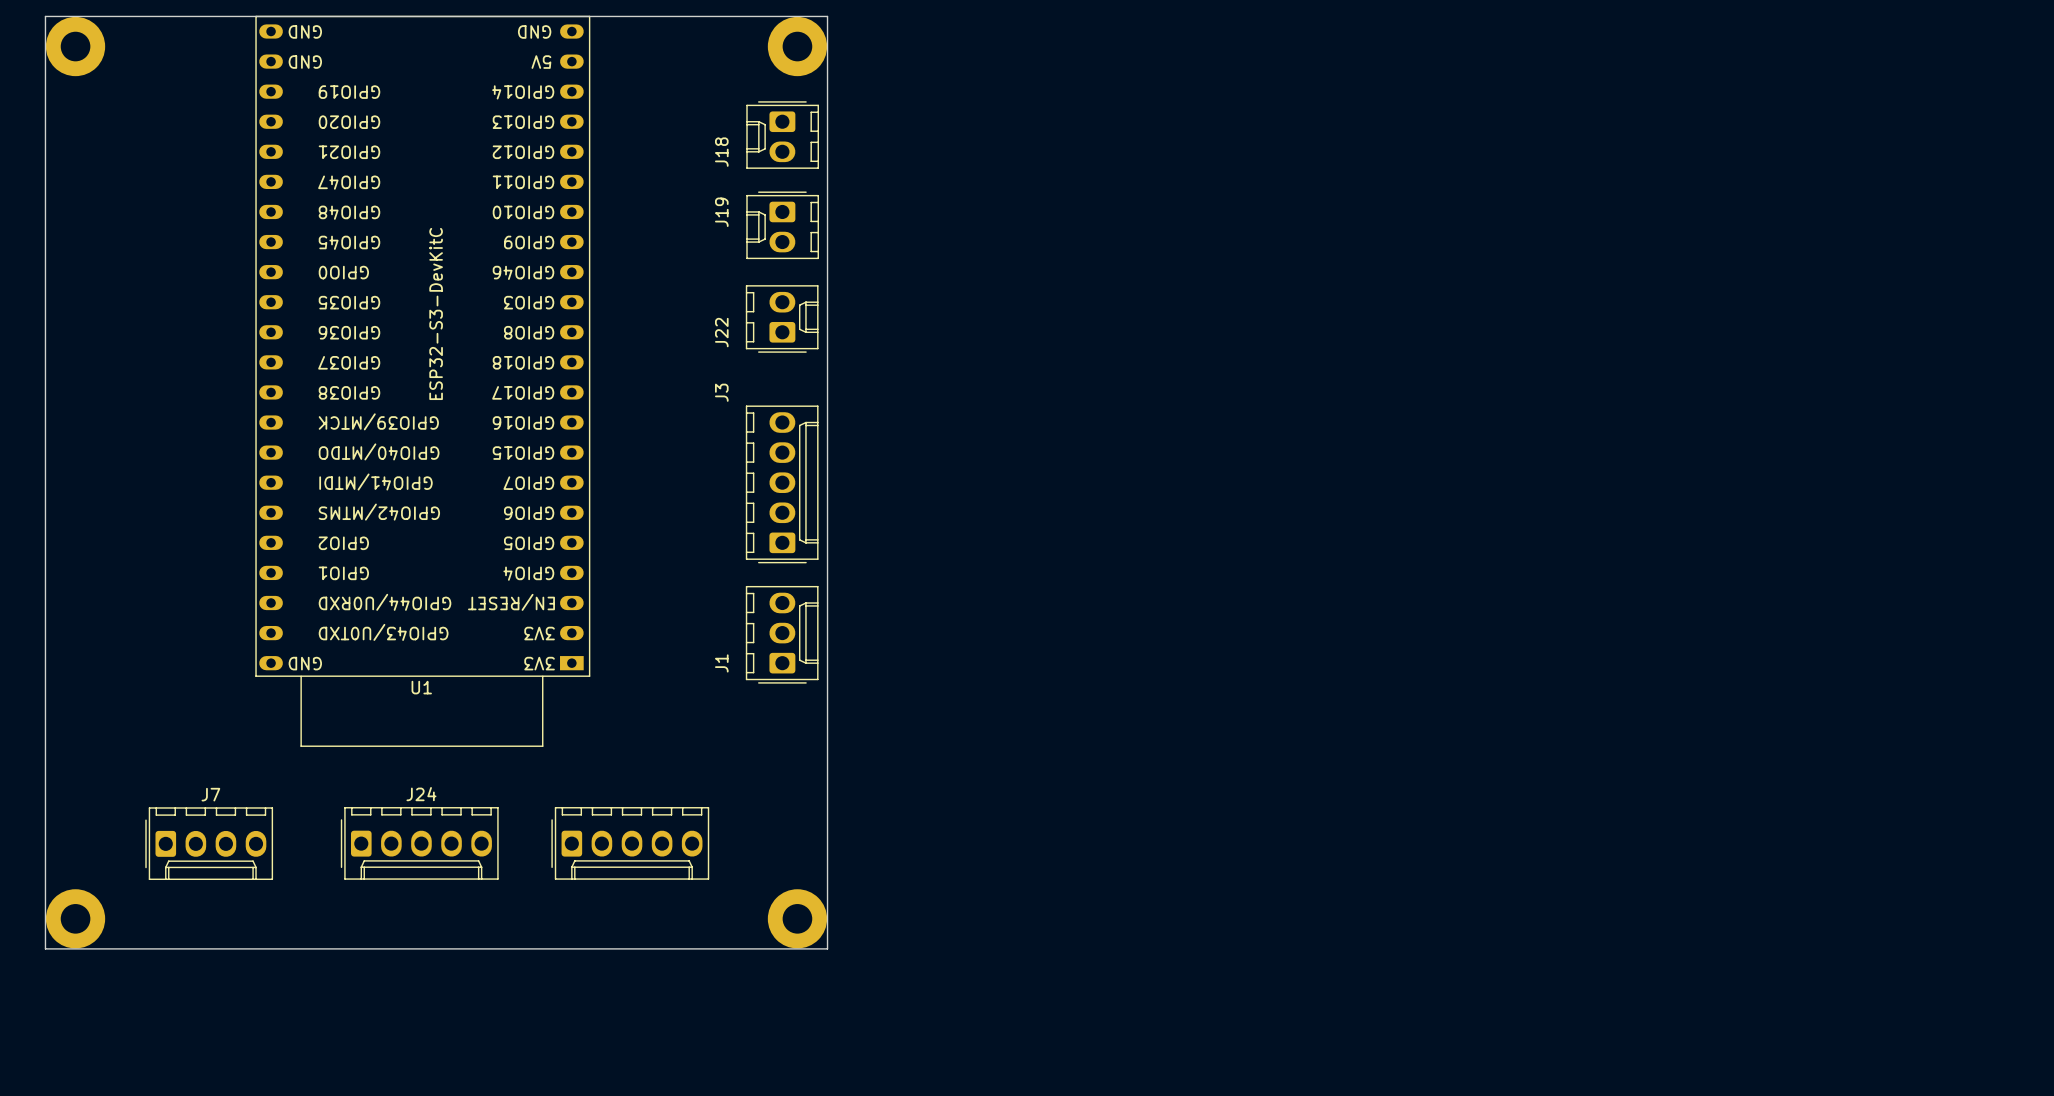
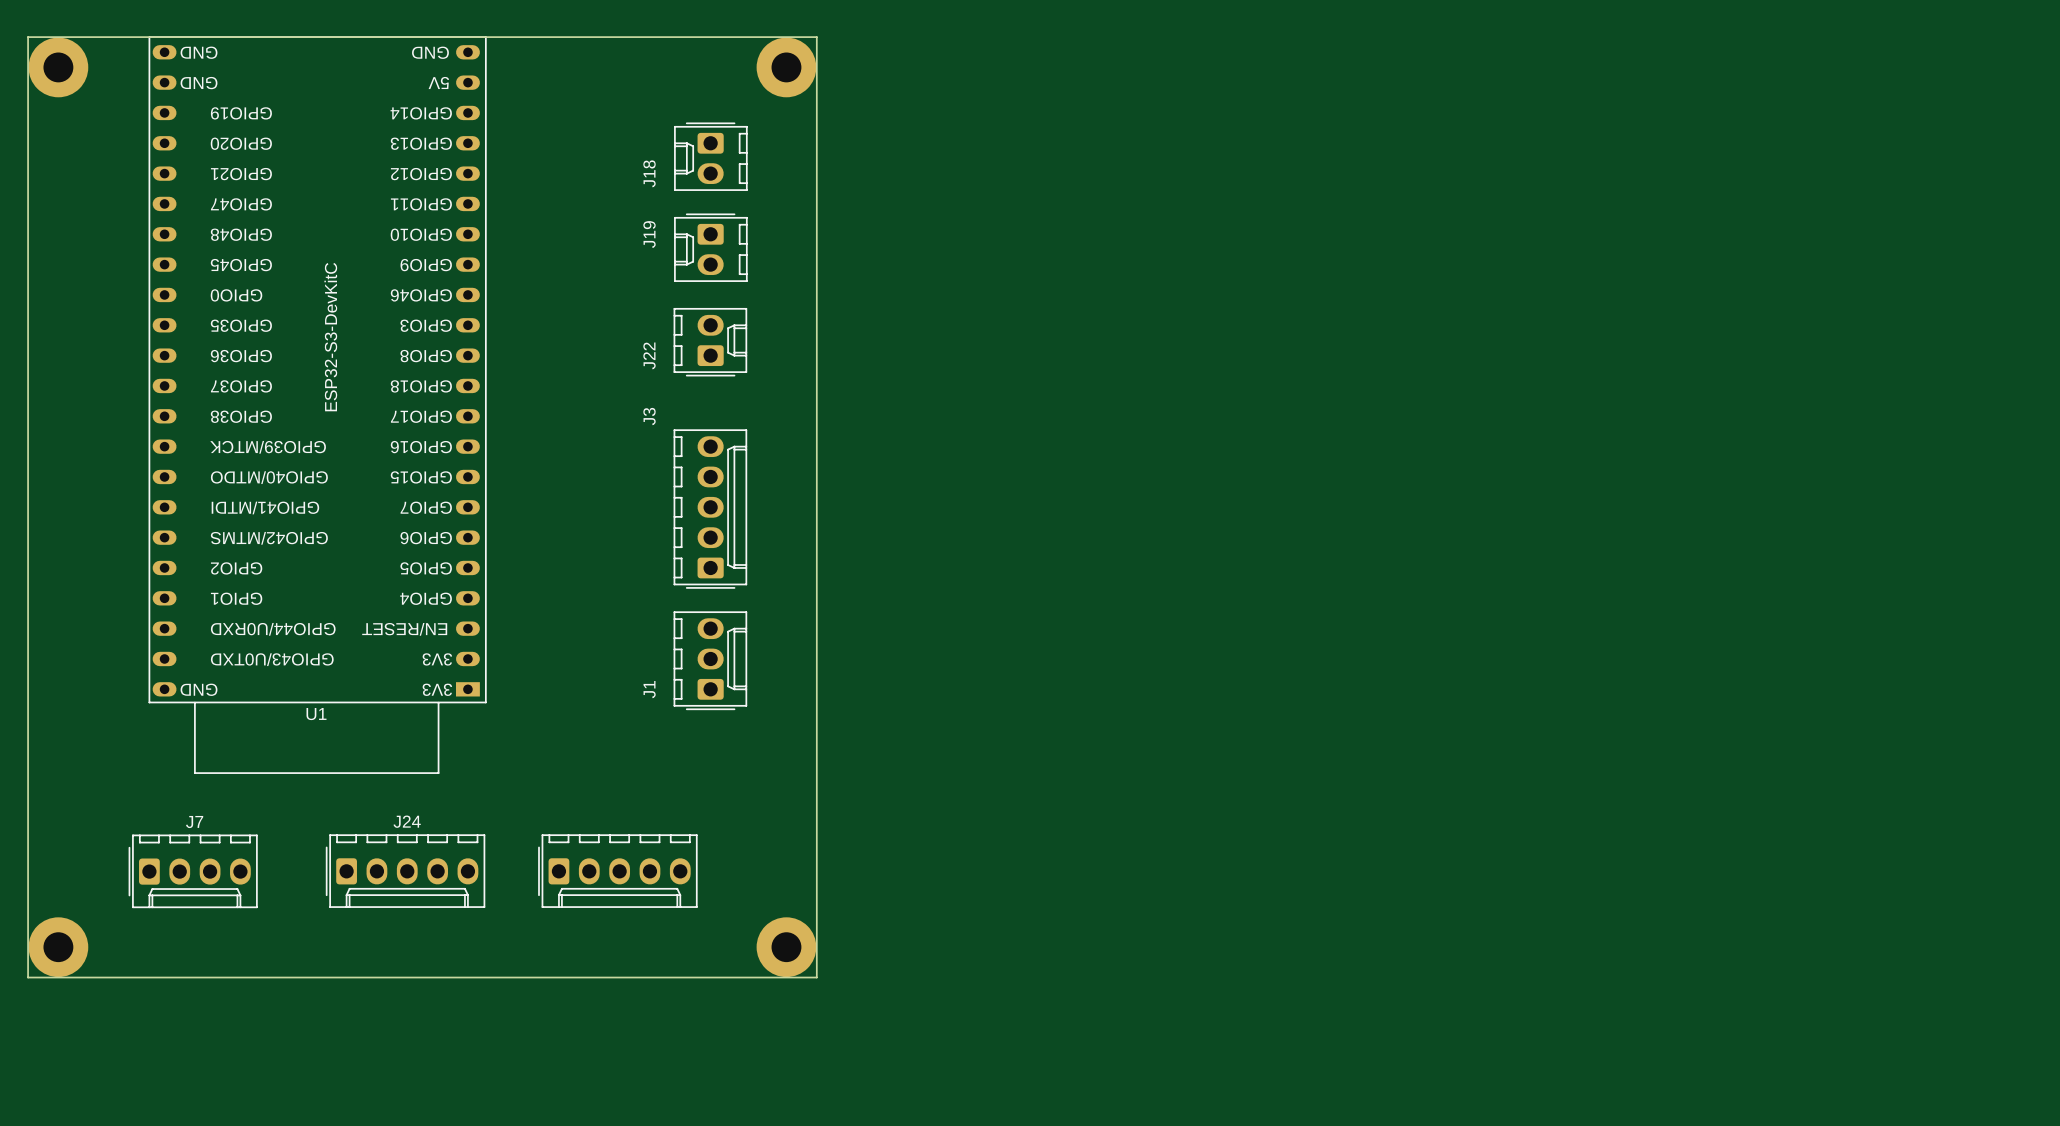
J18 position: (782, 135) -> (710, 156)
J19 position: (782, 225) -> (710, 247)
J22 position: (782, 318) -> (710, 342)
U1 position: (422, 381) -> (317, 405)
J3 position: (782, 484) -> (710, 509)
J1 position: (782, 634) -> (710, 660)

